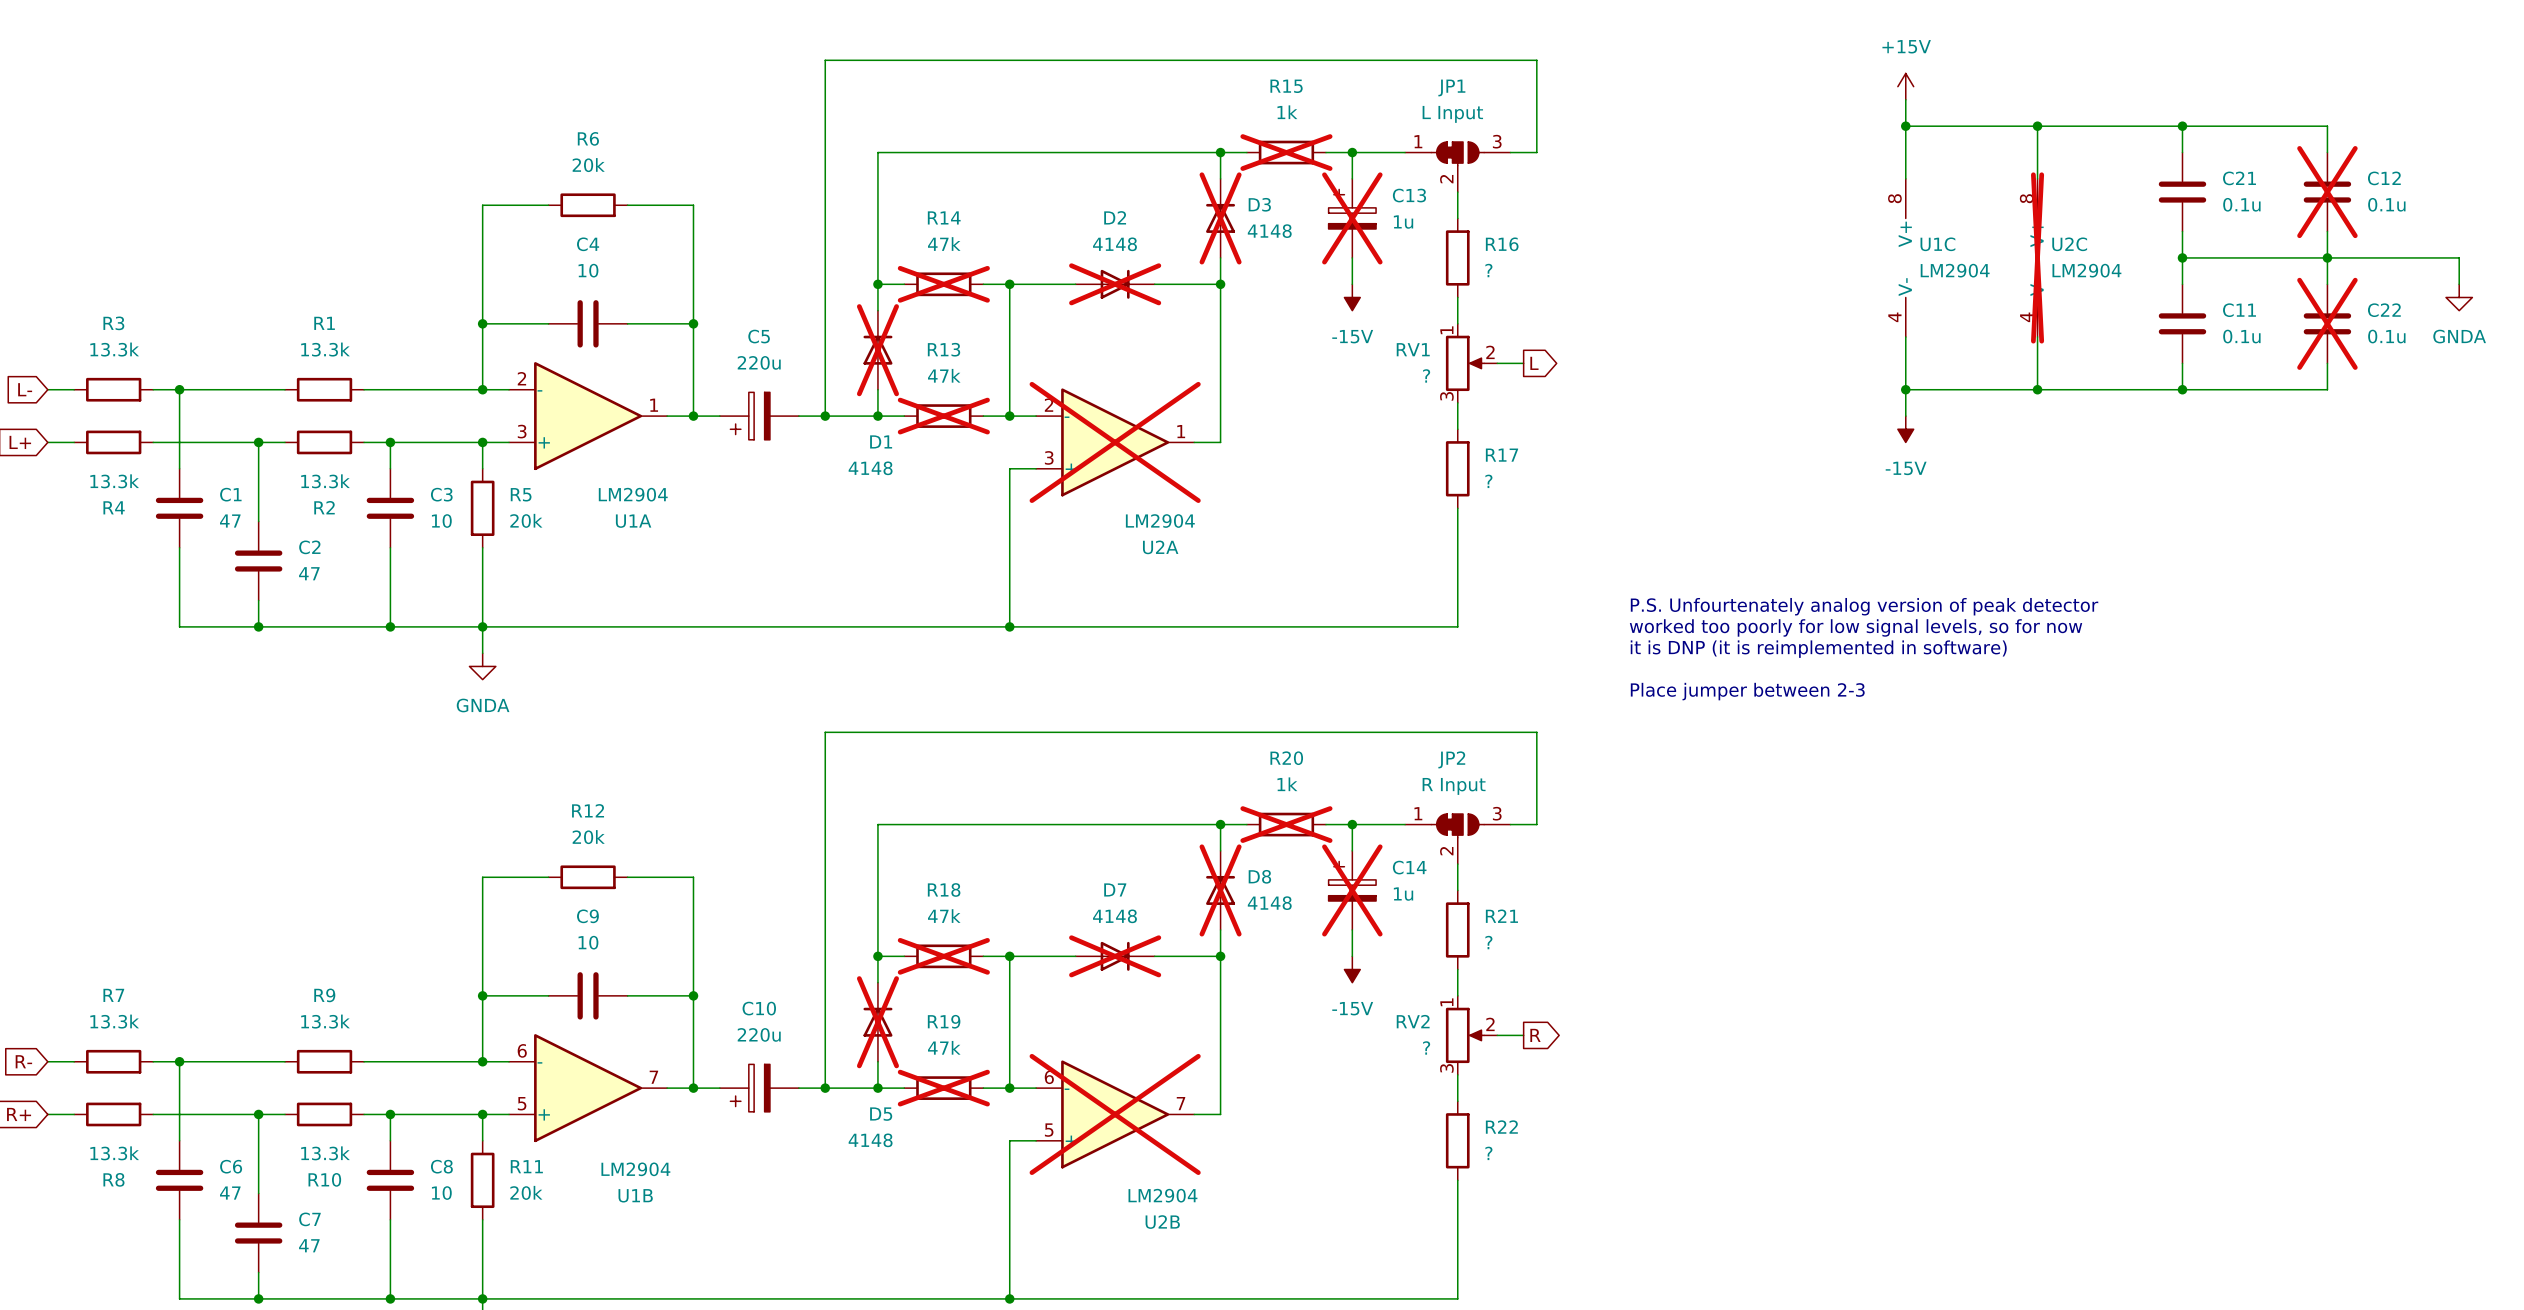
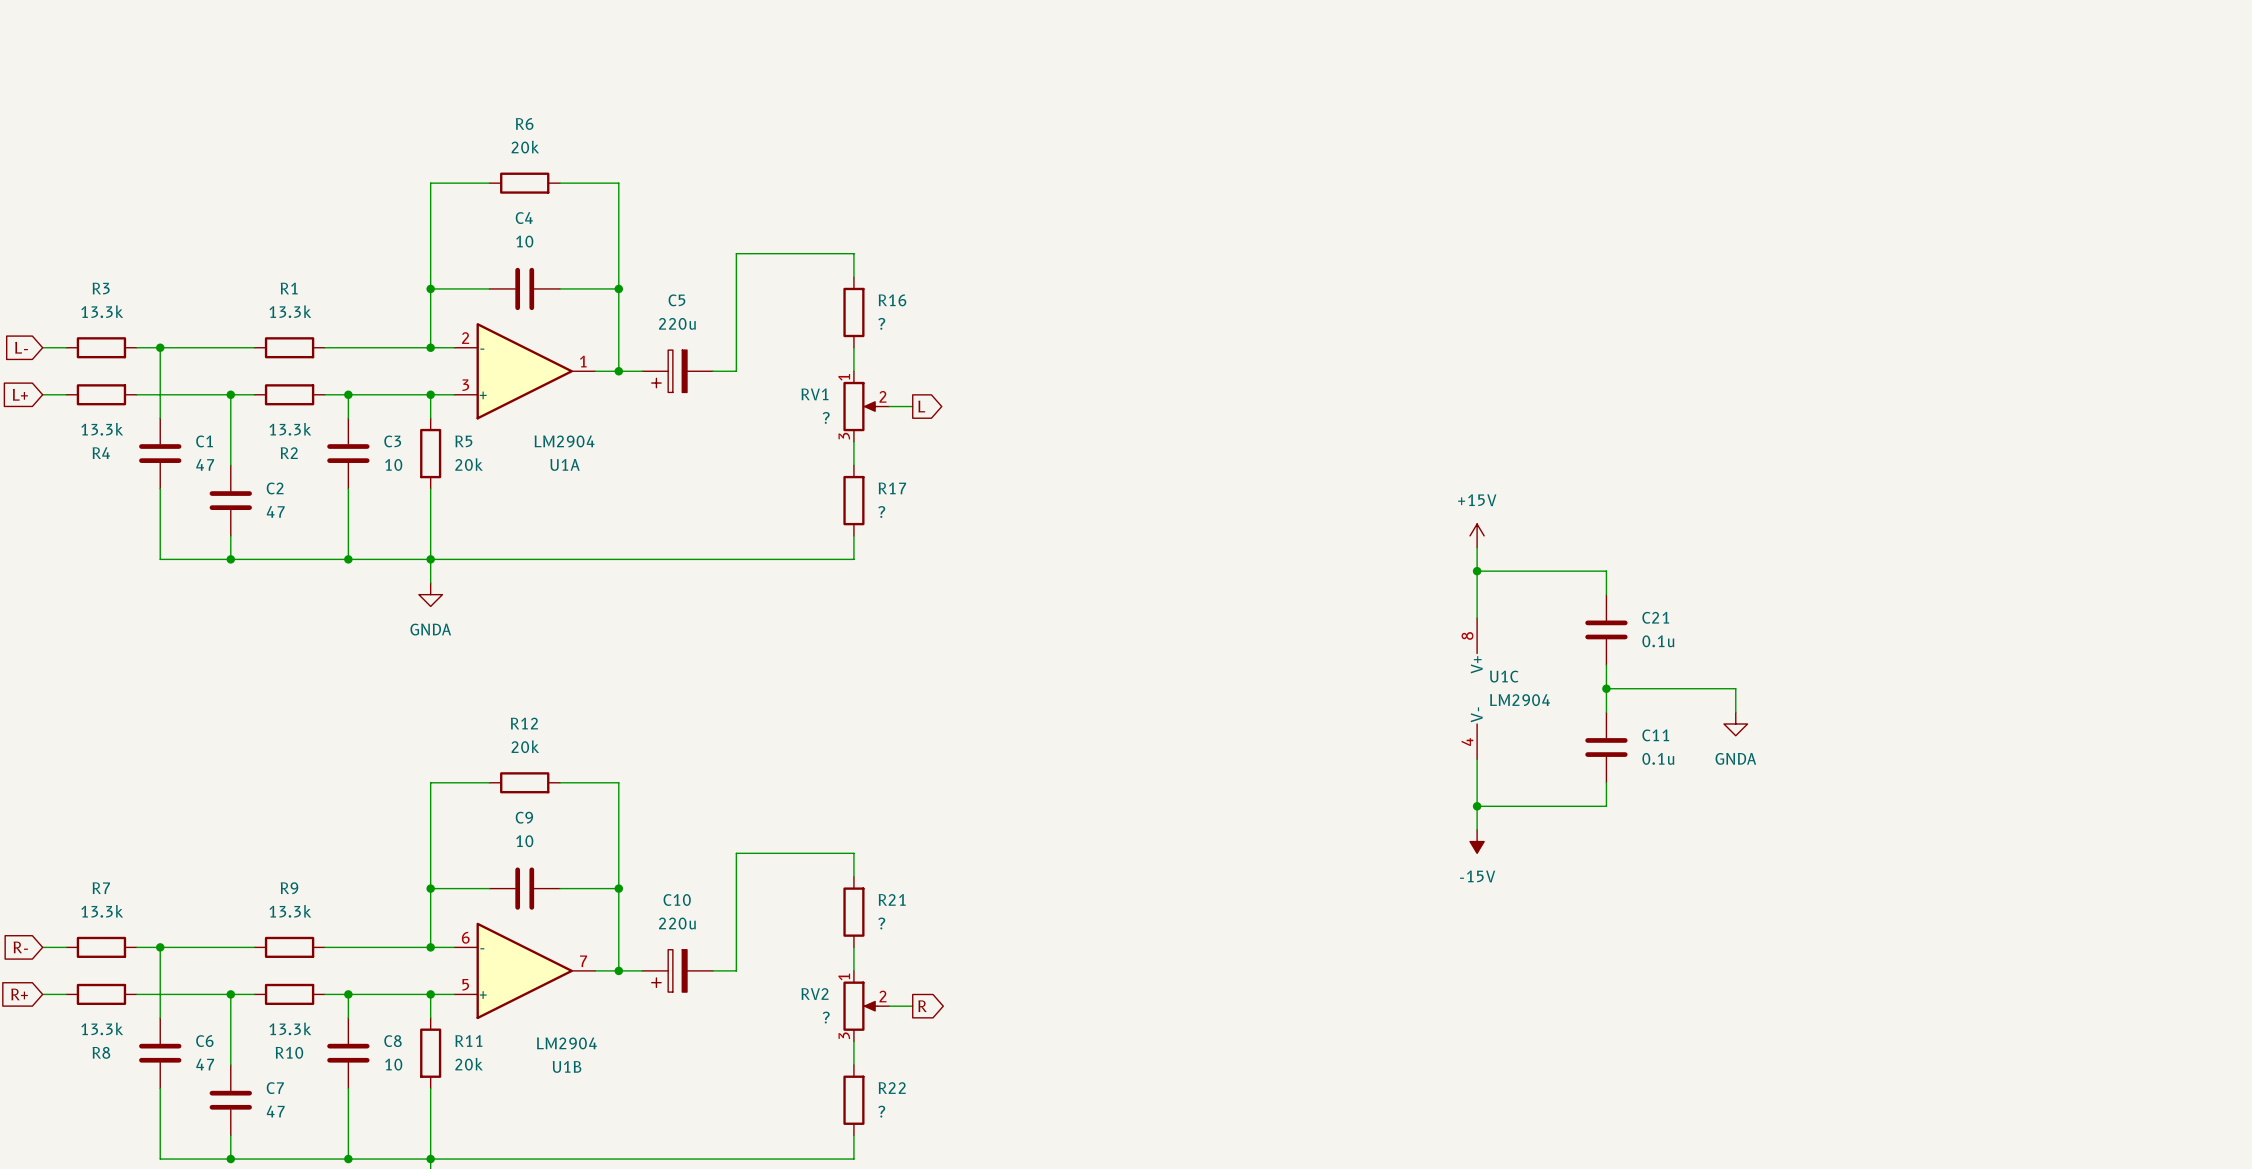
power symbol: +15V (1905, 86) -> none
wire: (1905, 99) (1905, 178) -> none
wire: (1905, 126) (2327, 126) (2327, 152) -> none
junction: (1905, 126) -> none
wire: (2037, 126) (2037, 178) -> none
junction: (2037, 126) -> none
wire: (2182, 126) (2182, 152) -> none
junction: (2182, 126) -> none
wire: (1220, 152) (1220, 178) -> none
junction: (1220, 152) -> none
wire: (1246, 152) (877, 152) (877, 310) -> none
R15: 1k (1286, 152) -> none
wire: (1325, 152) (1405, 152) -> none
wire: (1352, 152) (1352, 178) -> none
junction: (1352, 152) -> none
wire: (1510, 152) (1536, 152) (1536, 60) (825, 60) (825, 284) -> (783, 253) (736, 253)
JP1: L Input (1457, 167) -> none
wire: (1457, 192) (1457, 218) -> none
C21 position: (2182, 192) -> (1606, 629)
C12: 0.1u (2327, 192) -> none
D3: 4148 (1220, 218) -> none
C13: 1u (1352, 218) -> none
wire: (2182, 231) (2182, 284) -> none
wire: (2327, 231) (2327, 284) -> none
wire: (1220, 257) (1220, 442) (1194, 442) -> none
wire: (1352, 257) (1352, 284) -> none
R16 position: (1457, 257) -> (853, 312)
U1C position: (1905, 257) -> (1477, 688)
U2C: LM2904 (2037, 257) -> none
wire: (2182, 257) (2459, 257) (2459, 284) -> none
junction: (2182, 257) -> none
junction: (2327, 257) -> none
junction: (877, 284) -> none
wire: none -> (806, 253) (853, 253) (853, 277)
R14: 47k (943, 284) -> none
wire: (983, 284) (1075, 284) -> none
wire: (1009, 284) (1009, 416) -> none
junction: (1009, 284) -> none
D2: 4148 (1115, 284) -> none
wire: (1154, 284) (1220, 284) -> none
junction: (1220, 284) -> none
power symbol: -15V (1352, 297) -> none
wire: (1457, 297) (1457, 323) -> none
power symbol: GNDA (2459, 297) -> none
C11 position: (2182, 323) -> (1606, 747)
C22: 0.1u (2327, 323) -> none
wire: (1905, 337) (1905, 416) -> none
wire: (2037, 337) (2037, 389) -> none
D1: 4148 (877, 350) -> none
RV1 position: (1471, 363) -> (866, 406)
wire: (1497, 363) (1523, 363) -> none
global label: L (1534, 363) -> none
wire: (2182, 363) (2182, 389) -> none
wire: (2327, 363) (2327, 389) (1905, 389) -> none
wire: (877, 389) (877, 416) -> (853, 347) (853, 371)
junction: (1905, 389) -> none
junction: (2037, 389) -> none
junction: (2182, 389) -> none
wire: (1457, 402) (1457, 429) -> none
wire: (825, 416) (904, 416) -> none
junction: (825, 416) -> none
junction: (877, 416) -> none
R13: 47k (943, 416) -> none
wire: (983, 416) (1036, 416) -> none
junction: (1009, 416) -> none
power symbol: -15V (1905, 429) -> none
U2A: LM2904 (1115, 442) -> none
wire: none -> (889, 406) (912, 406)
global label: none -> L (921, 406)
wire: (1036, 468) (1009, 468) (1009, 626) -> none
R17 position: (1457, 468) -> (853, 500)
wire: none -> (853, 441) (853, 465)
wire: (1457, 508) (1457, 626) (957, 626) -> (853, 535) (853, 559)
power symbol: none -> +15V (1477, 535)
text: P.S. Unfourtenately analog version of peak detector (1864, 606) -> none
wire: none -> (1477, 547) (1477, 618)
junction: (1009, 626) -> none
text: worked too poorly for low signal levels, so for now (1856, 627) -> none
wire: none -> (1477, 571) (1606, 571) (1606, 594)
junction: none -> (1477, 571)
text: it is DNP (it is reimplemented in software) (1818, 649) -> none
text: Place jumper between 2-3 (1747, 691) -> none
wire: none -> (1606, 665) (1606, 712)
wire: none -> (1606, 688) (1735, 688) (1735, 712)
junction: none -> (1606, 688)
power symbol: none -> GNDA (1735, 723)
wire: (1220, 824) (1220, 850) -> none
junction: (1220, 824) -> none
wire: (1246, 824) (877, 824) (877, 982) -> none
R20: 1k (1286, 824) -> none
wire: (1325, 824) (1405, 824) -> none
wire: (1352, 824) (1352, 850) -> none
junction: (1352, 824) -> none
wire: (1510, 824) (1536, 824) (1536, 732) (825, 732) (825, 956) -> (783, 853) (736, 853)
JP2: R Input (1457, 839) -> none
wire: none -> (1477, 759) (1477, 829)
wire: (1457, 864) (1457, 890) -> none
wire: none -> (1606, 782) (1606, 806) (1477, 806)
D8: 4148 (1220, 890) -> none
C14: 1u (1352, 890) -> none
junction: none -> (1477, 806)
wire: (1220, 929) (1220, 1114) (1194, 1114) -> none
wire: (1352, 929) (1352, 956) -> none
R21 position: (1457, 929) -> (853, 912)
power symbol: none -> -15V (1477, 841)
junction: (877, 956) -> none
wire: none -> (806, 853) (853, 853) (853, 876)
R18: 47k (943, 956) -> none
wire: (983, 956) (1075, 956) -> none
wire: (1009, 956) (1009, 1088) -> none
junction: (1009, 956) -> none
D7: 4148 (1115, 956) -> none
wire: (1154, 956) (1220, 956) -> none
junction: (1220, 956) -> none
power symbol: -15V (1352, 969) -> none
wire: (1457, 969) (1457, 995) -> none
D5: 4148 (877, 1022) -> none
RV2 position: (1471, 1035) -> (866, 1006)
wire: (1497, 1035) (1523, 1035) -> none
global label: R (1535, 1035) -> none
wire: (877, 1061) (877, 1088) -> (853, 947) (853, 970)
wire: (1457, 1074) (1457, 1101) -> none
wire: (825, 1088) (904, 1088) -> none
junction: (825, 1088) -> none
junction: (877, 1088) -> none
R19: 47k (943, 1088) -> none
wire: (983, 1088) (1036, 1088) -> none
junction: (1009, 1088) -> none
U2B: LM2904 (1115, 1114) -> none
wire: none -> (889, 1006) (912, 1006)
global label: none -> R (922, 1006)
wire: (1036, 1140) (1009, 1140) (1009, 1298) -> none
R22 position: (1457, 1140) -> (853, 1100)
wire: none -> (853, 1041) (853, 1064)
wire: (1457, 1180) (1457, 1298) (957, 1298) -> (853, 1135) (853, 1159)
junction: (1009, 1298) -> none

